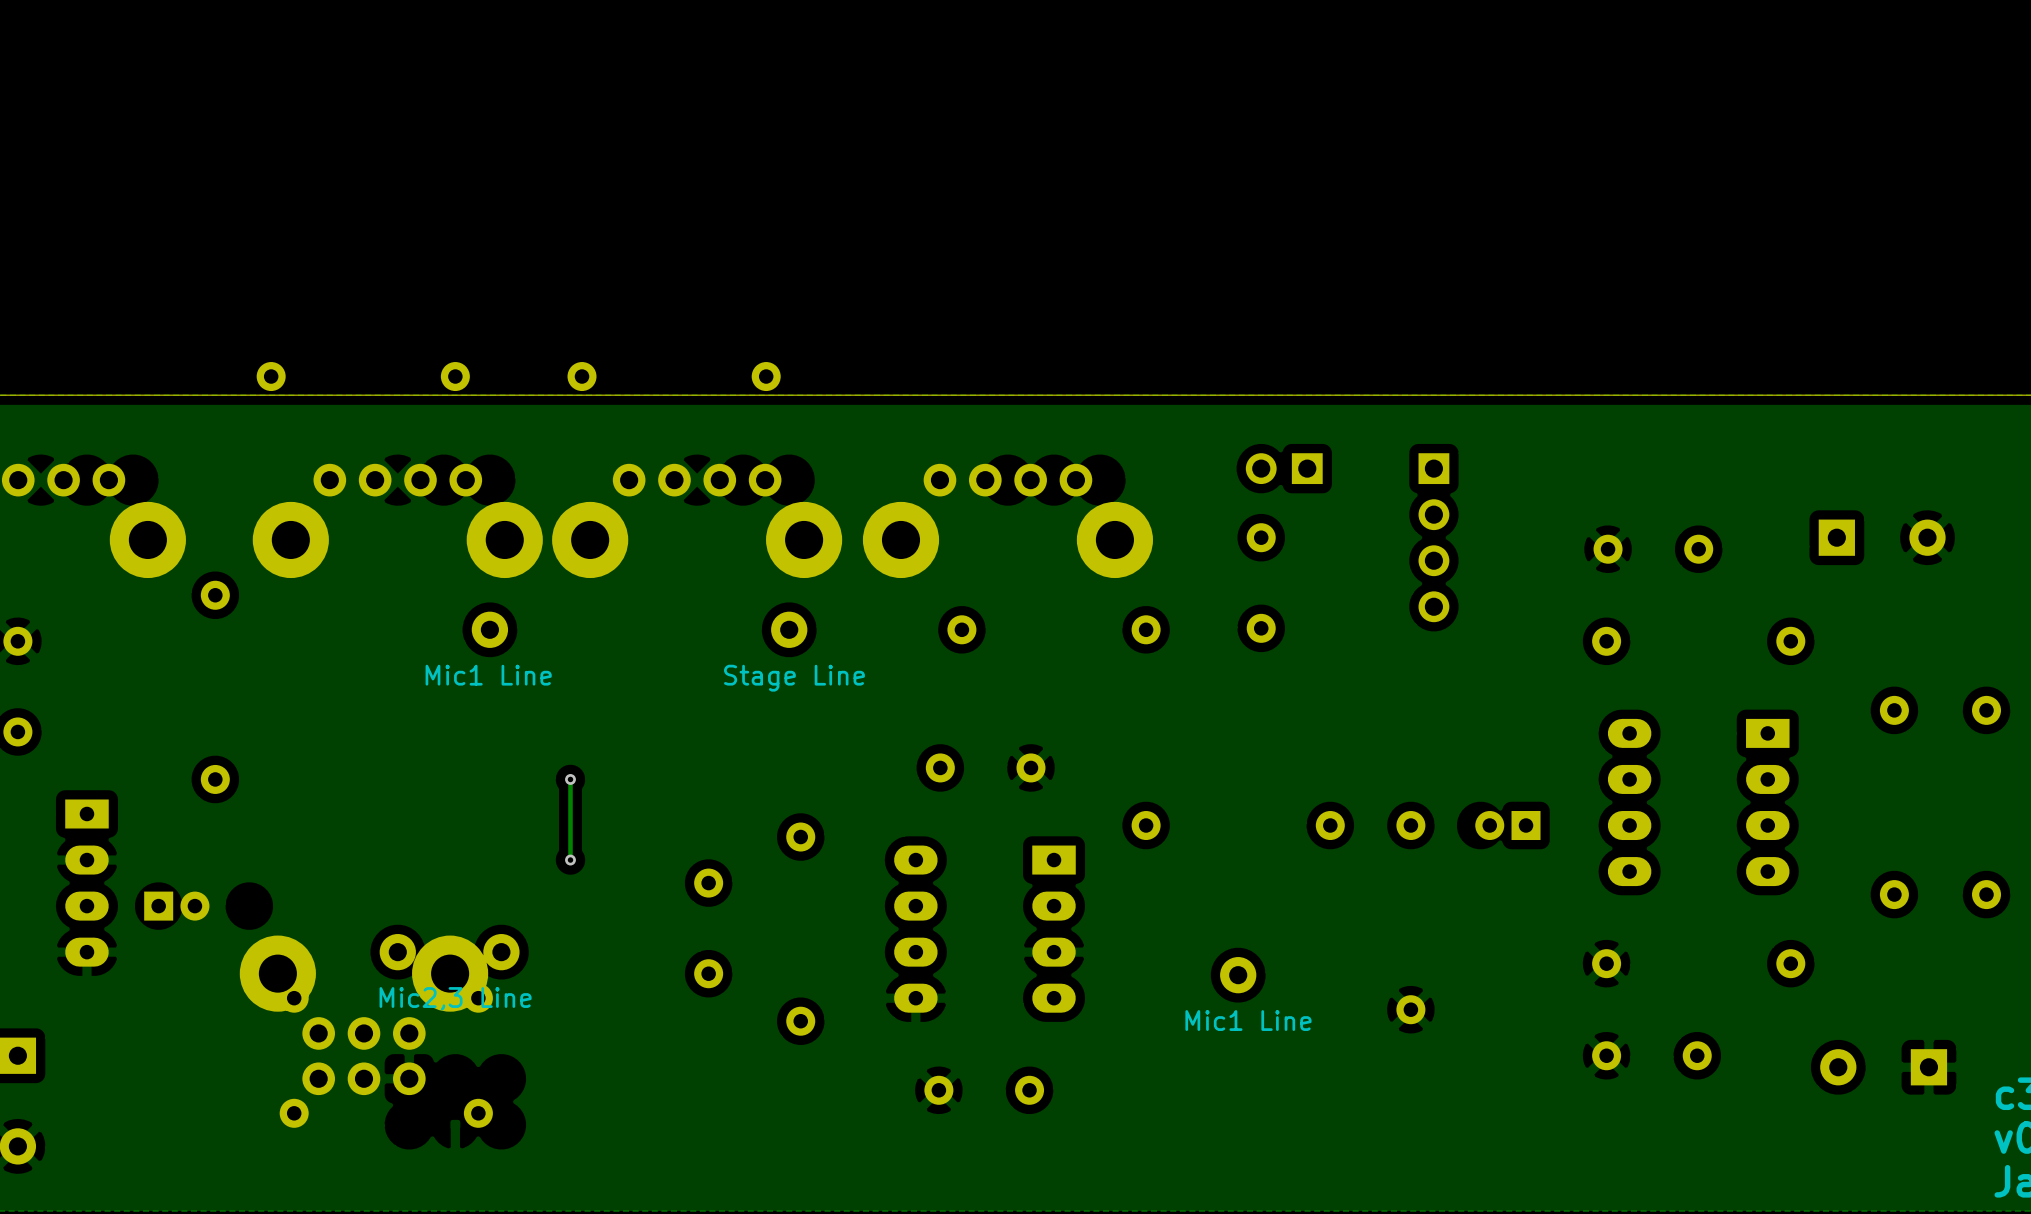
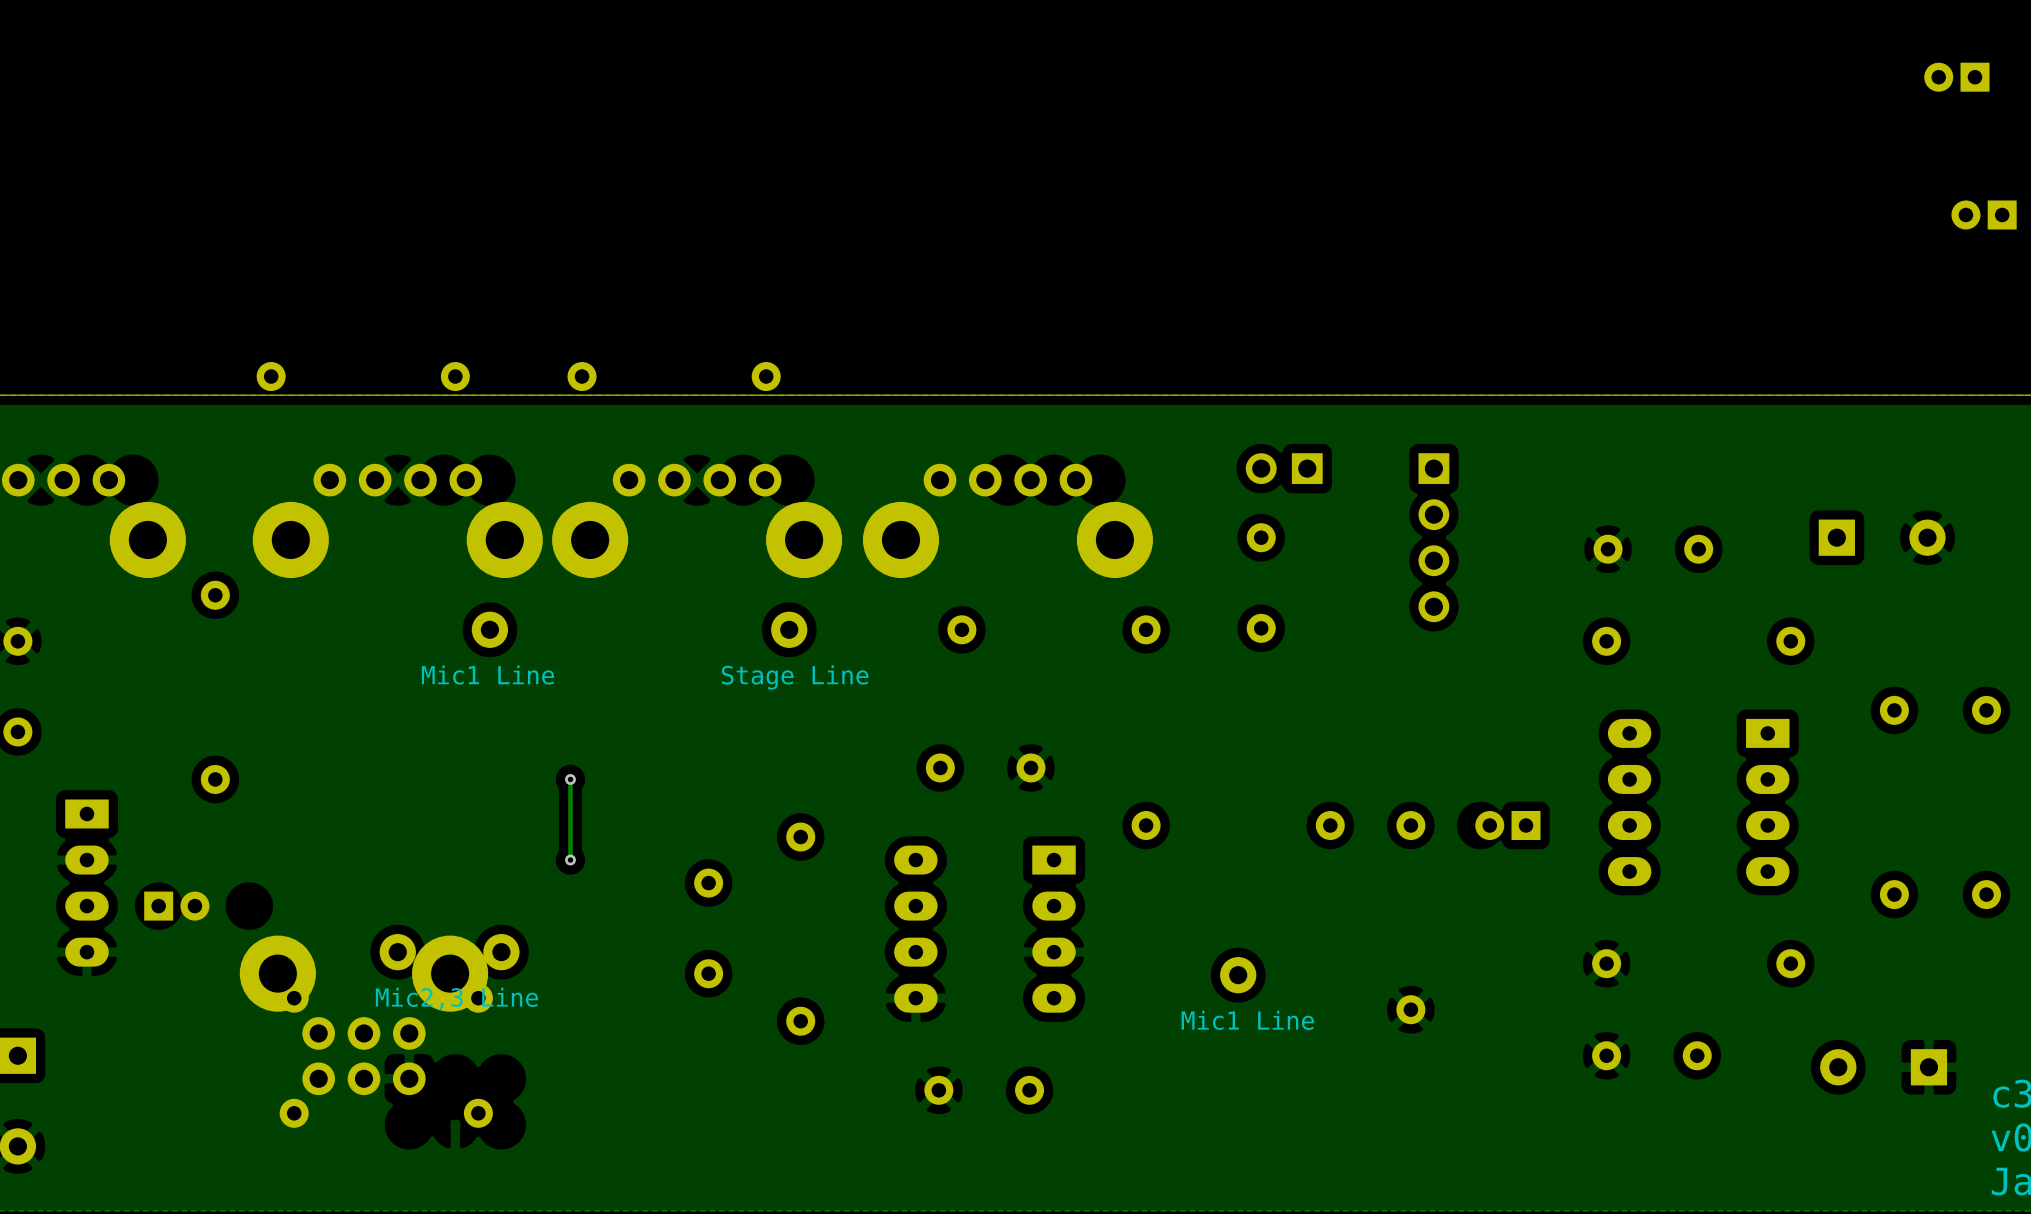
part: none -> (1956, 77)
part: none -> (1984, 214)

